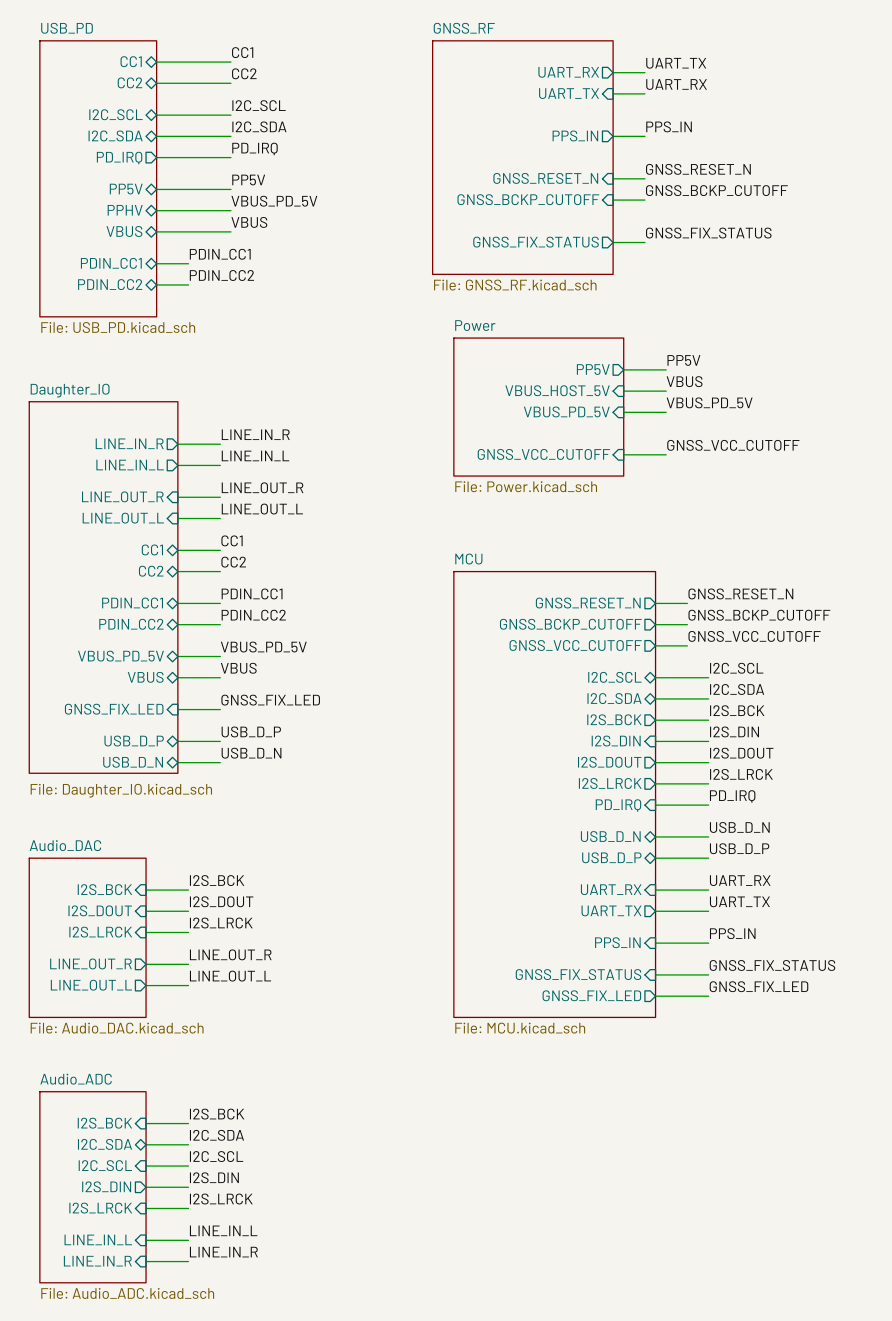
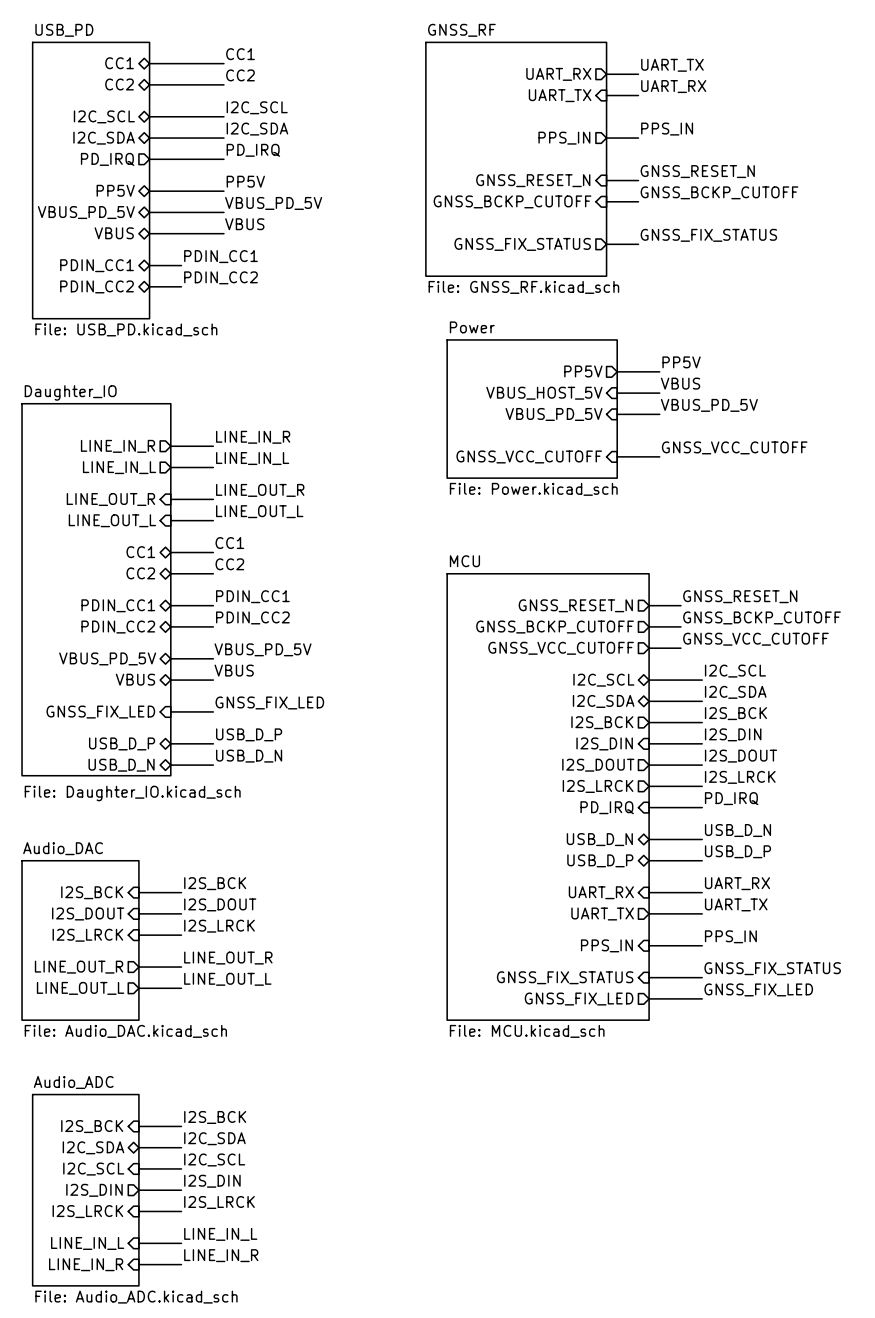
sheet pin: PPHV (125, 210) -> VBUS_PD_5V (86, 212)

